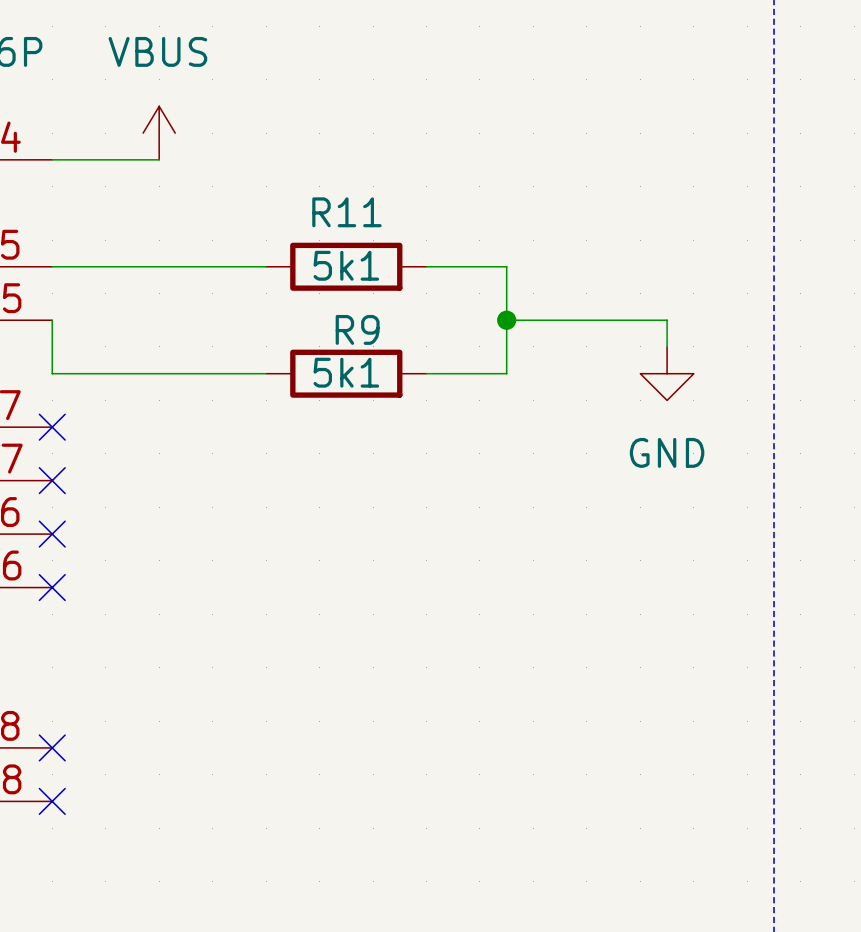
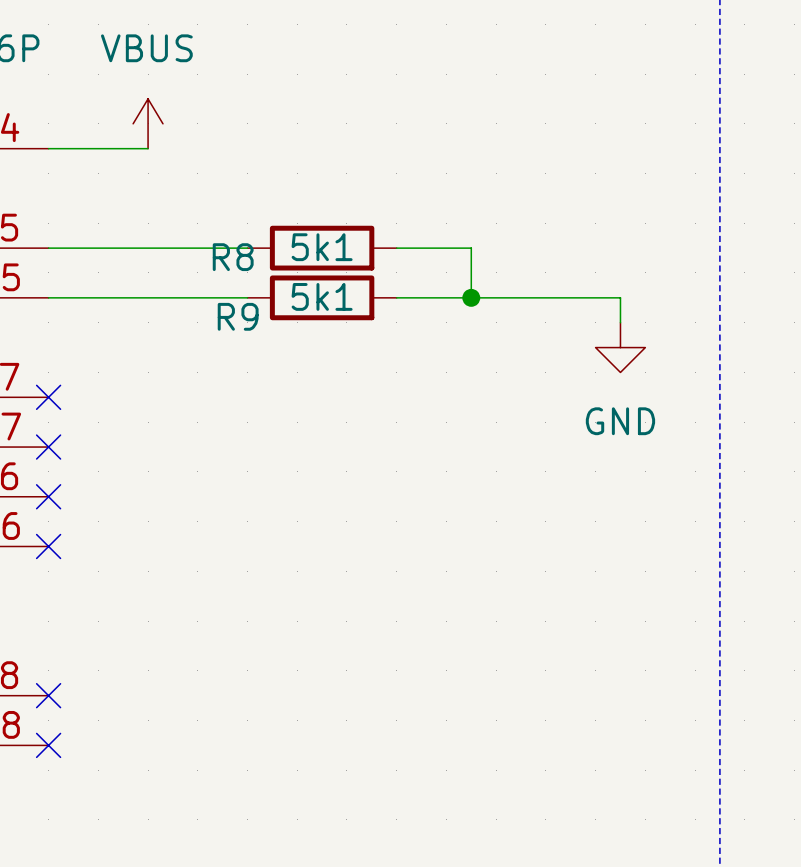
R11 name: R11 (346, 212) -> R8 (233, 257)
wire: (52, 320) (52, 373) (266, 373) -> (48, 297) (247, 297)
wire: (506, 320) (506, 373) (426, 373) -> (471, 297) (396, 297)
R9 name position: R9 (357, 329) -> R9 (238, 316)
R9 position: (346, 373) -> (322, 297)

